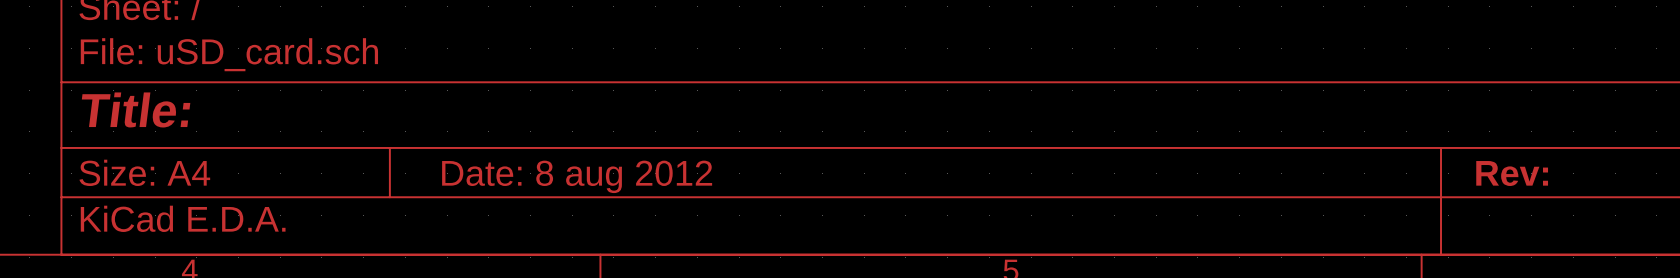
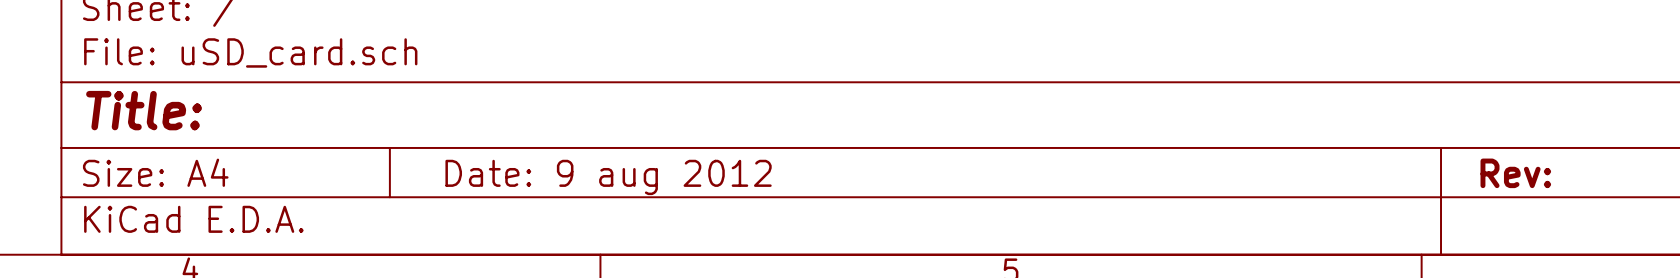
title block: Date: 8 aug 2012 (577, 176) -> Date: 9 aug 2012 (608, 177)

